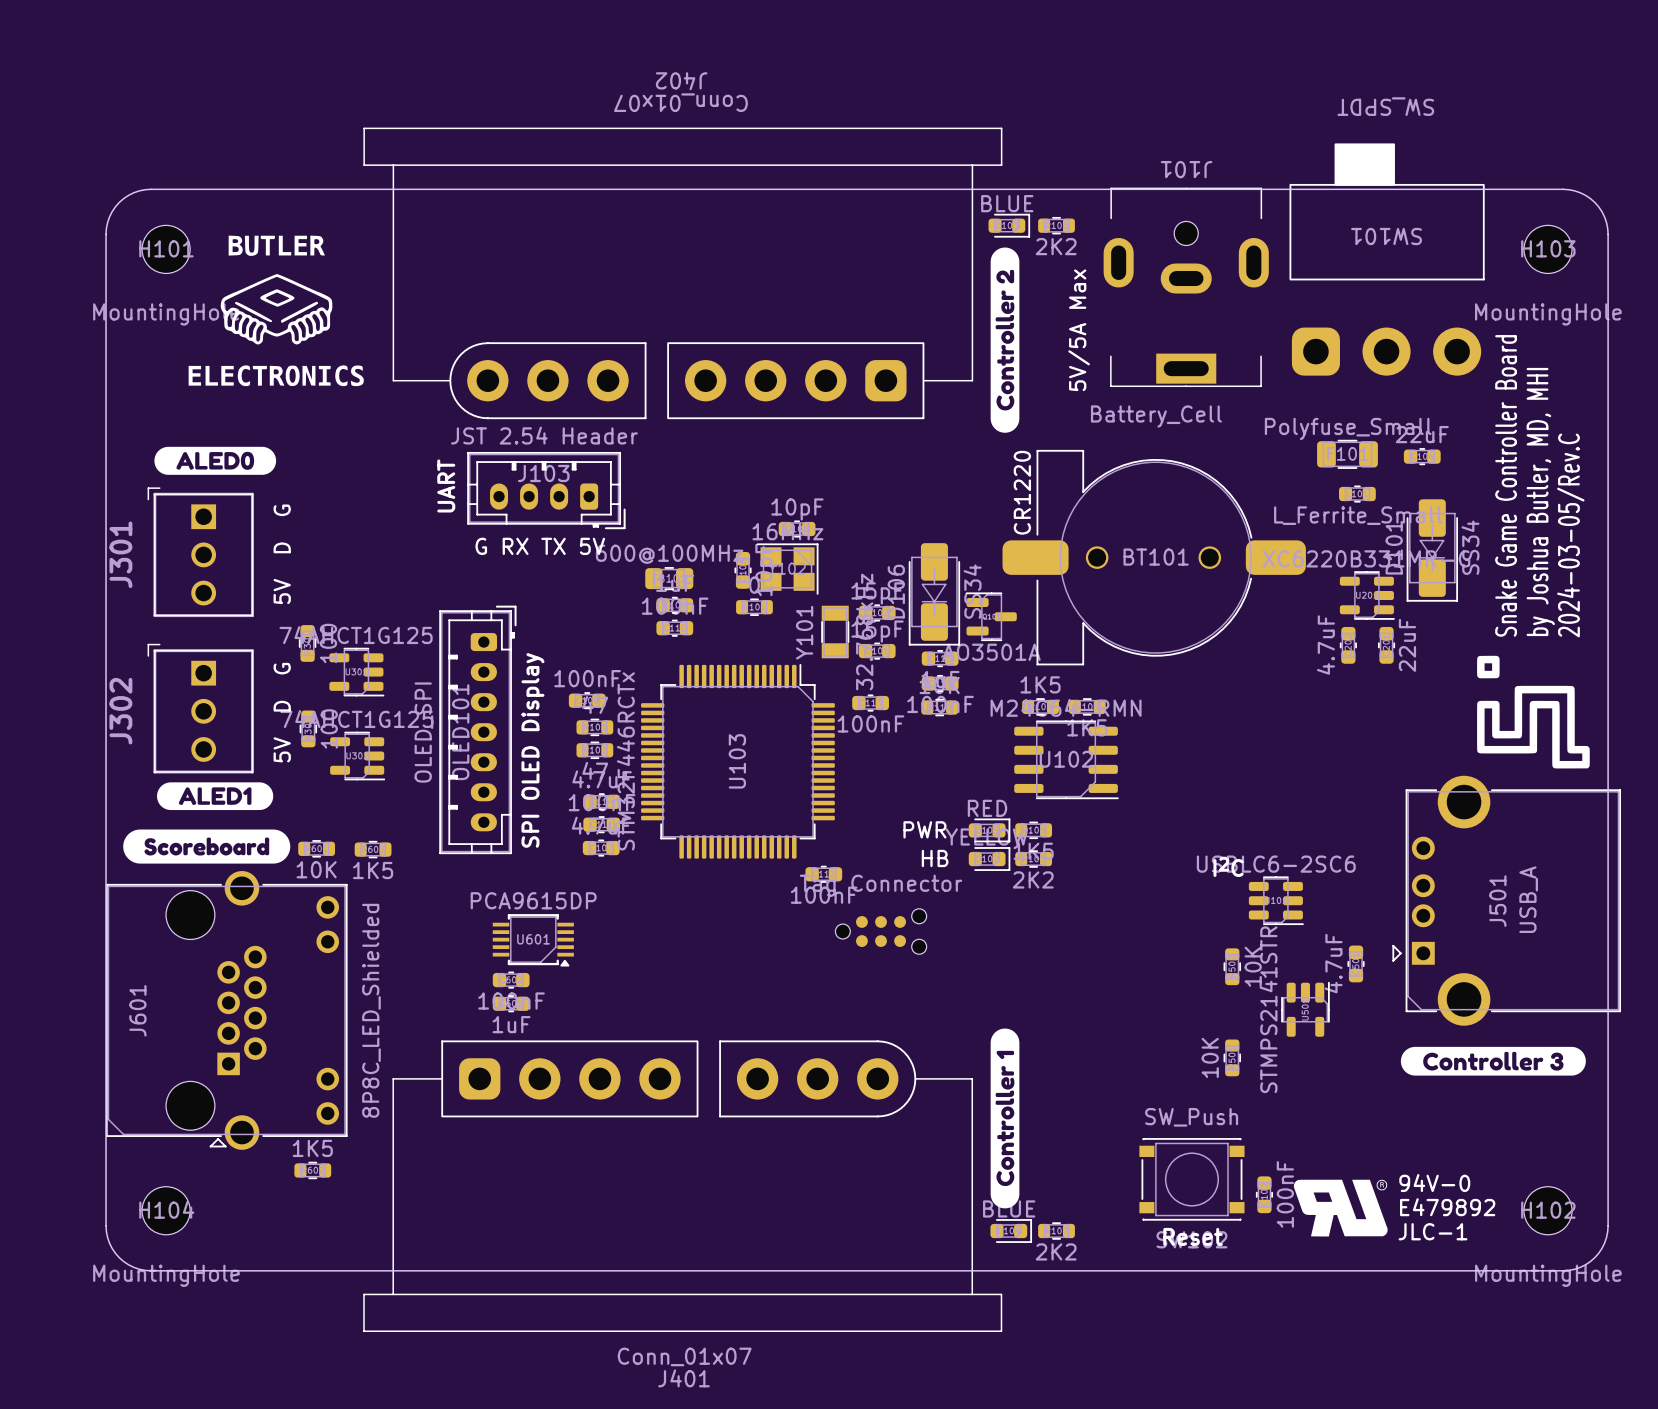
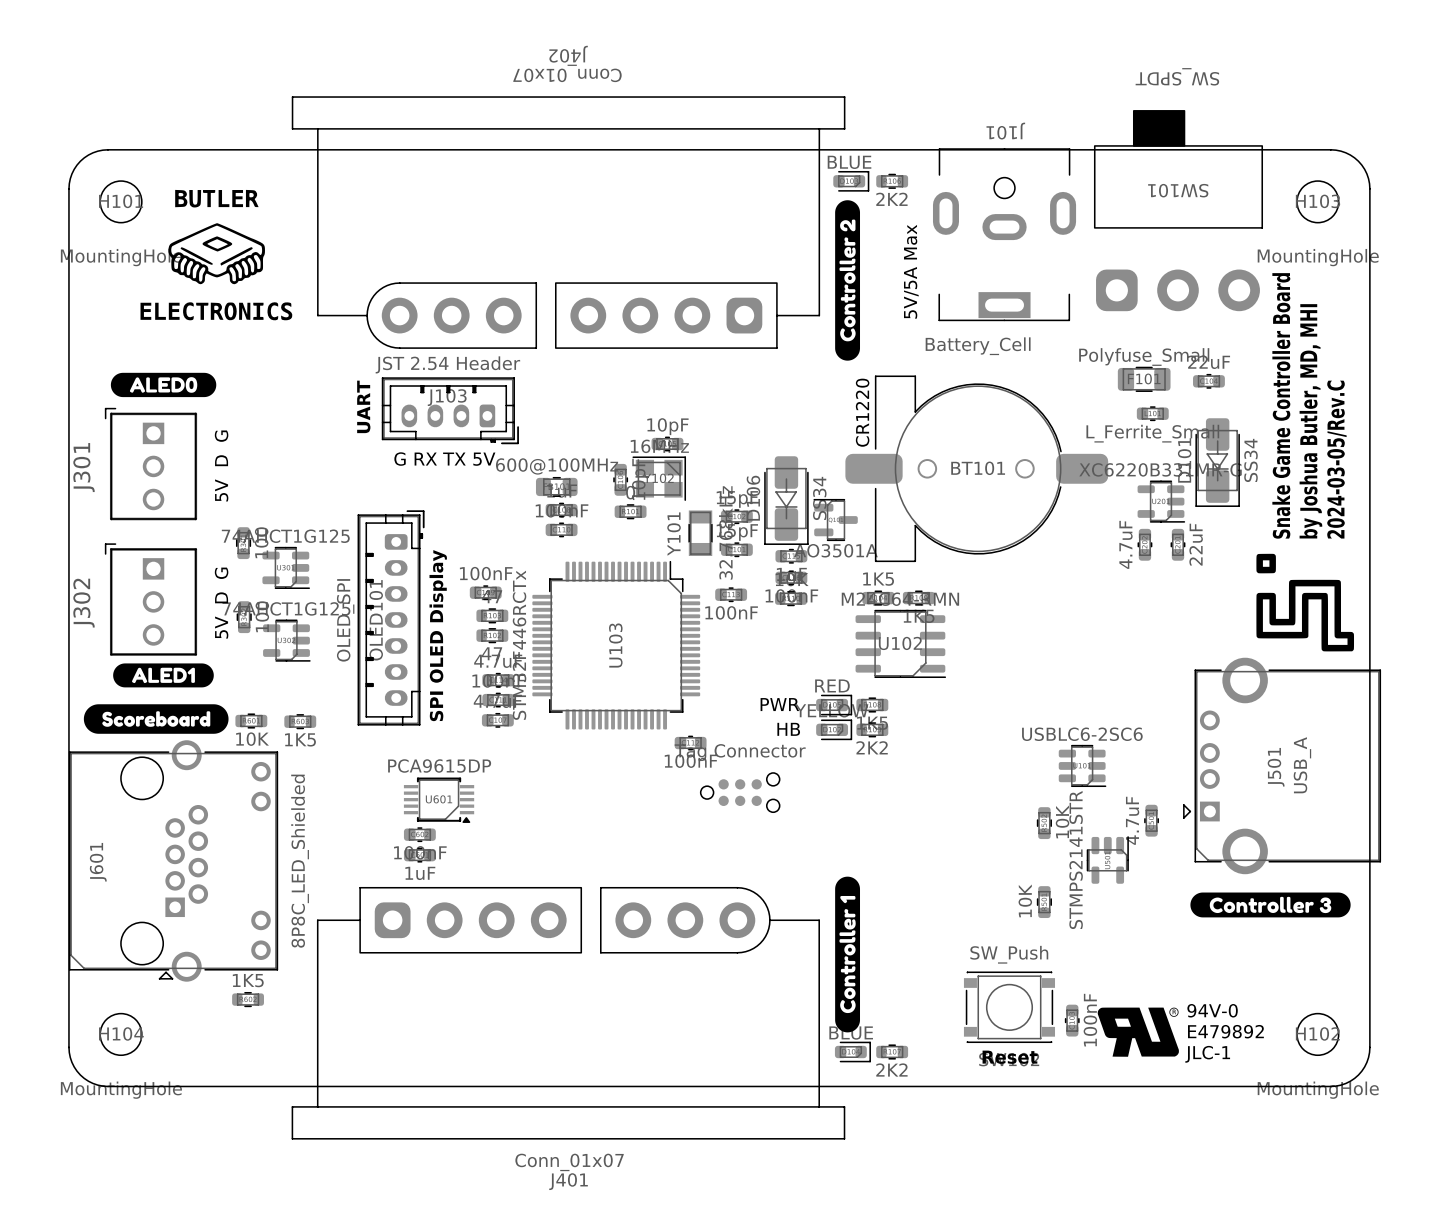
text: I2C (1228, 866) -> none

